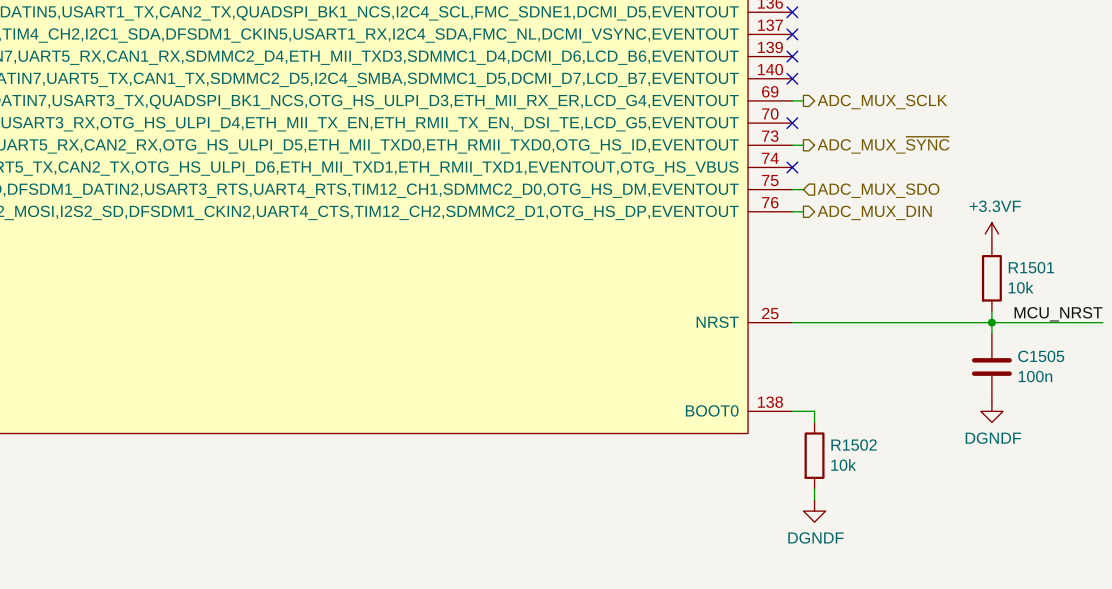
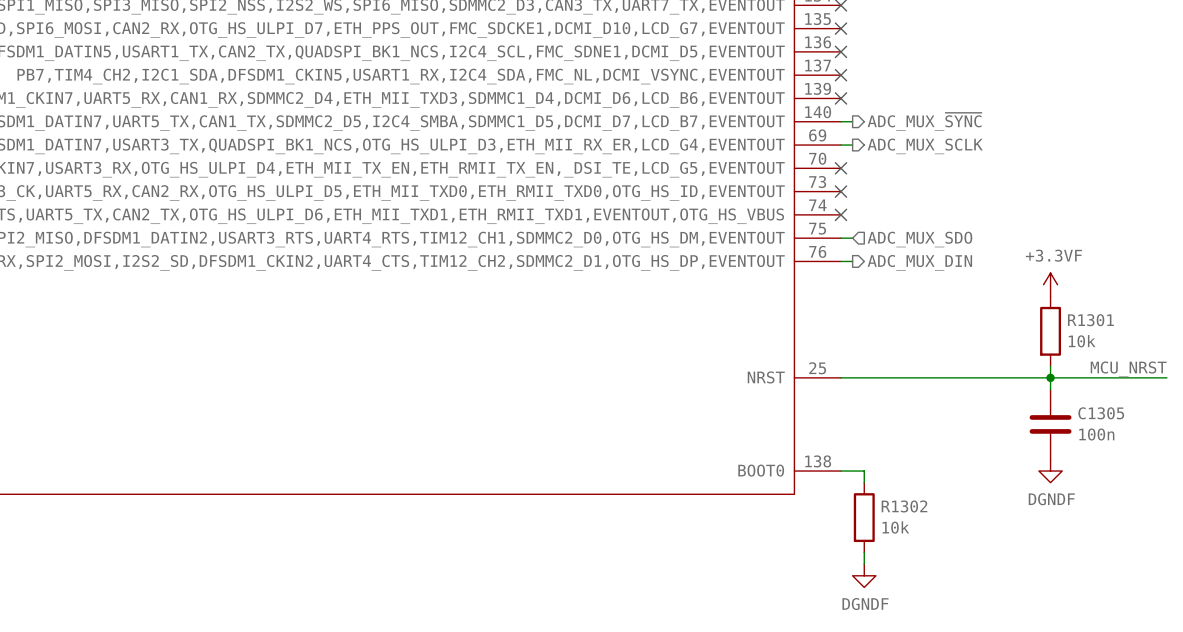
no-connect mark: (792, 78) -> none
wire: (792, 145) (803, 145) -> (840, 121) (852, 121)
no-connect mark: none -> (840, 191)
hierarchical label position: ADC_MUX_~{SYNC} (883, 145) -> ADC_MUX_~{SYNC} (924, 121)
R1501 name: R1501 (1031, 267) -> R1301 (1090, 320)
C1505 name: C1505 (1041, 356) -> C1305 (1101, 413)
R1502 name: R1502 (854, 445) -> R1302 (904, 506)

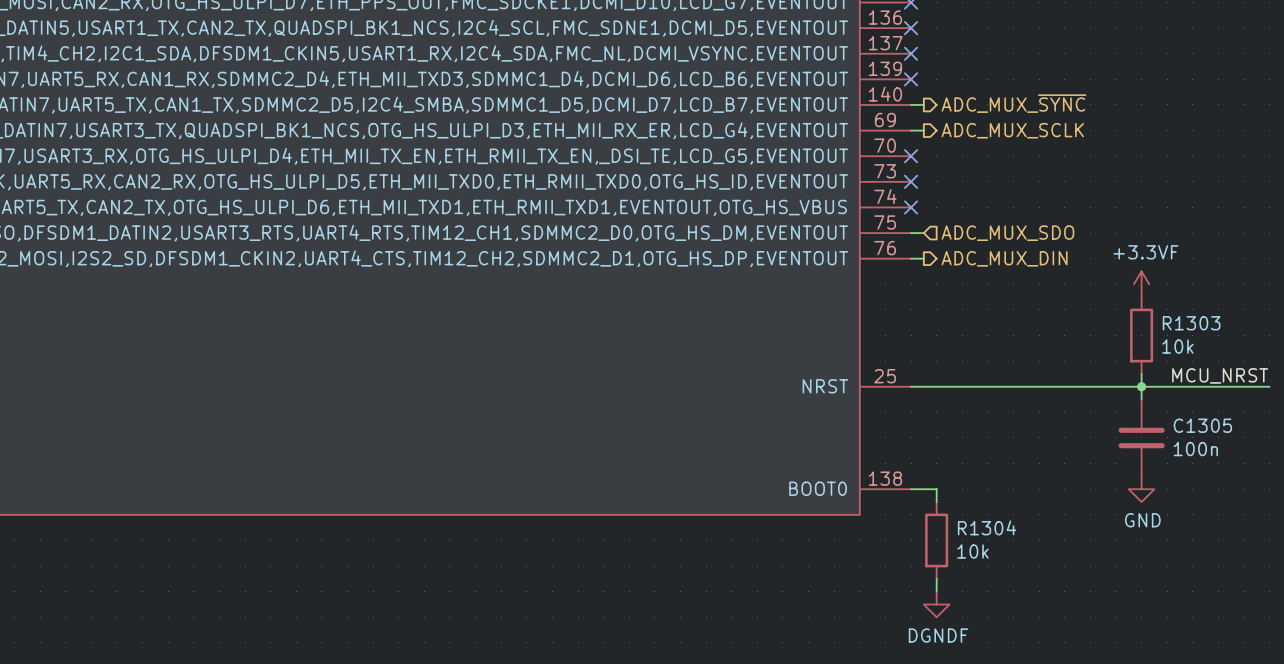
R1301 name: R1301 (1090, 320) -> R1303 (1191, 323)
power symbol: DGNDF (1050, 471) -> GND (1141, 489)
R1302 name: R1302 (904, 506) -> R1304 (987, 527)

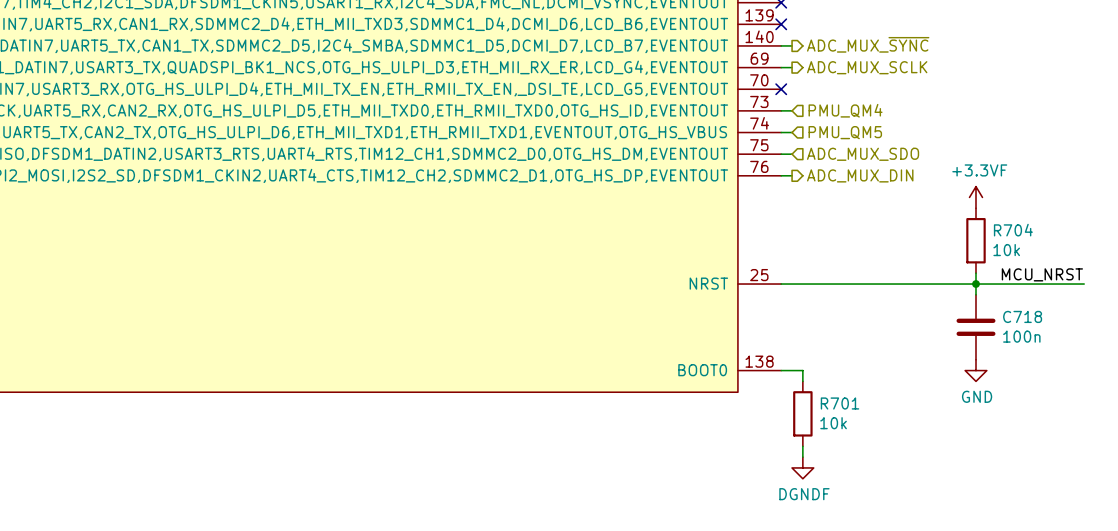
wire: none -> (781, 110) (792, 110)
no-connect mark: (911, 181) -> none
hierarchical label: none -> PMU_QM4 (845, 110)
wire: none -> (781, 132) (792, 132)
no-connect mark: (911, 207) -> none
hierarchical label: none -> PMU_QM5 (845, 132)
R1303 name: R1303 (1191, 323) -> R704 (1013, 230)
C1305 name: C1305 (1202, 425) -> C718 (1022, 316)
R1304 name: R1304 (987, 527) -> R701 (840, 403)

